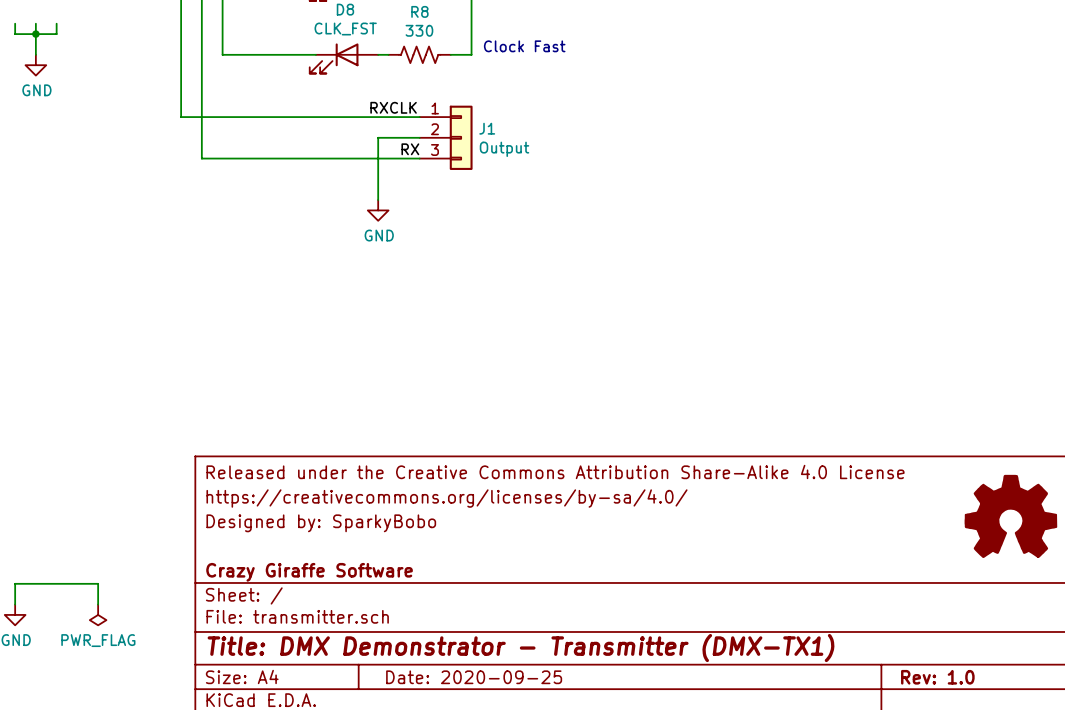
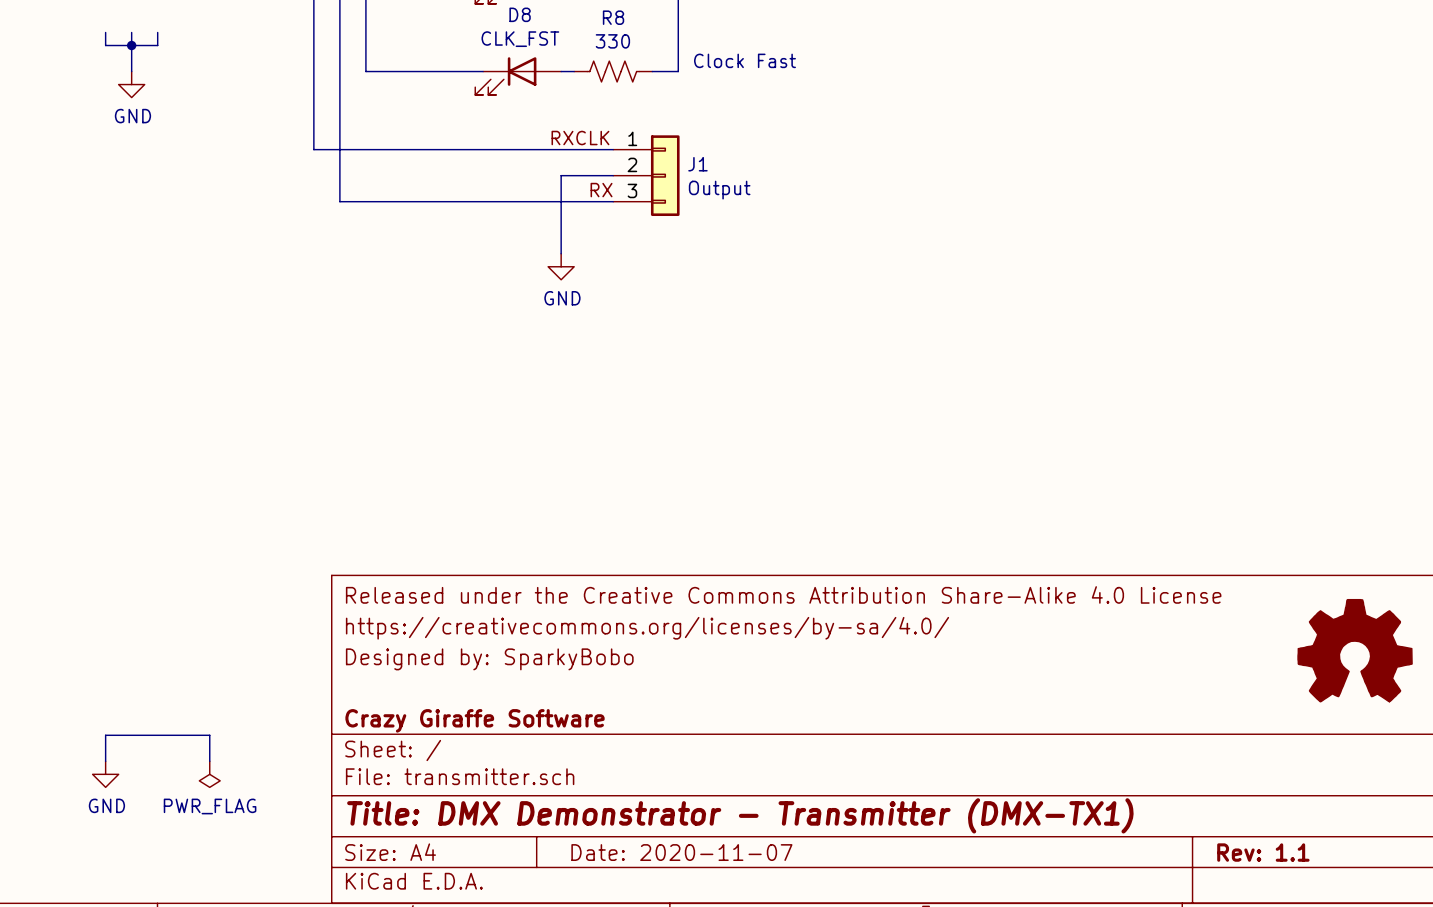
title block: Date: 2020-09-25 (474, 677) -> Date: 2020-11-07 (681, 852)
title block: Rev: 1.0 (937, 677) -> Rev: 1.1 (1263, 852)

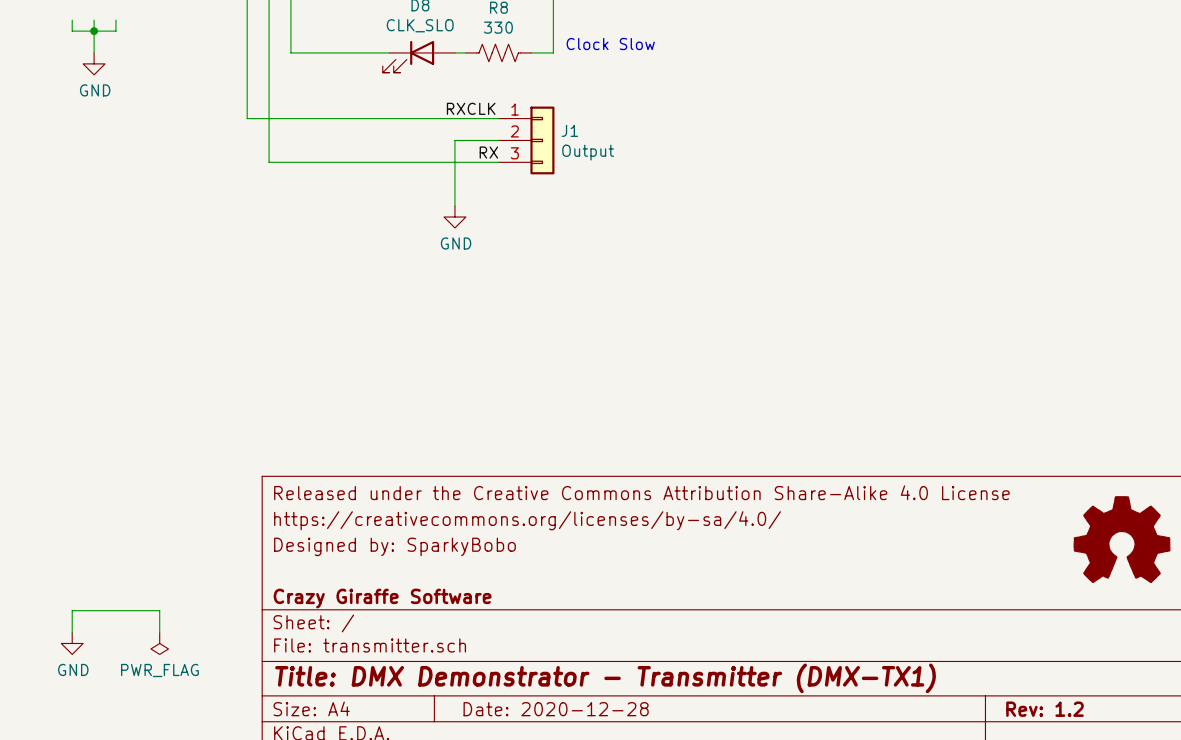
D8 value: CLK_FST (520, 39) -> CLK_SLO (420, 25)
text: Clock Fast (745, 60) -> Clock Slow (610, 44)
title block: Date: 2020-11-07 (681, 852) -> Date: 2020-12-28 (556, 709)
title block: Rev: 1.1 (1263, 852) -> Rev: 1.2 (1044, 709)

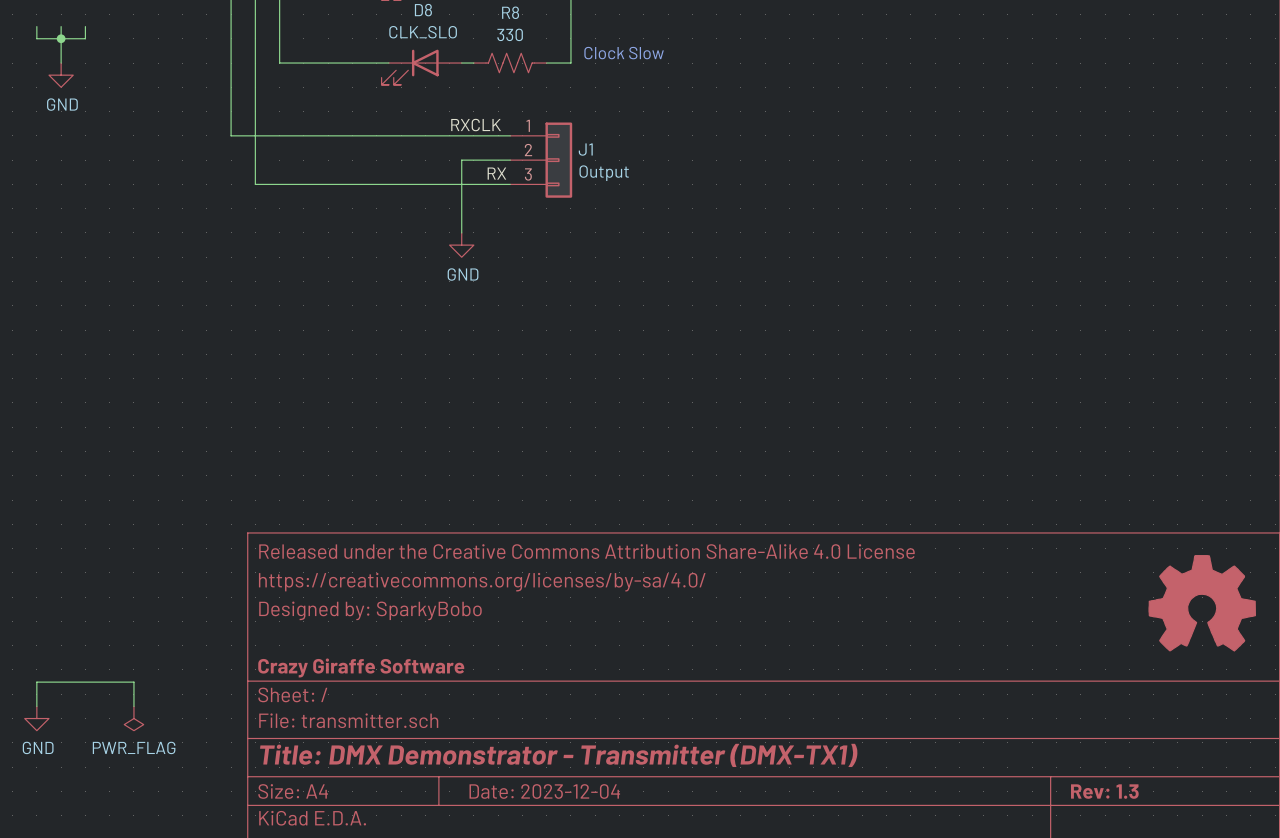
title block: Date: 2020-12-28 (556, 709) -> Date: 2023-12-04 (544, 791)
title block: Rev: 1.2 (1044, 709) -> Rev: 1.3 (1104, 791)

